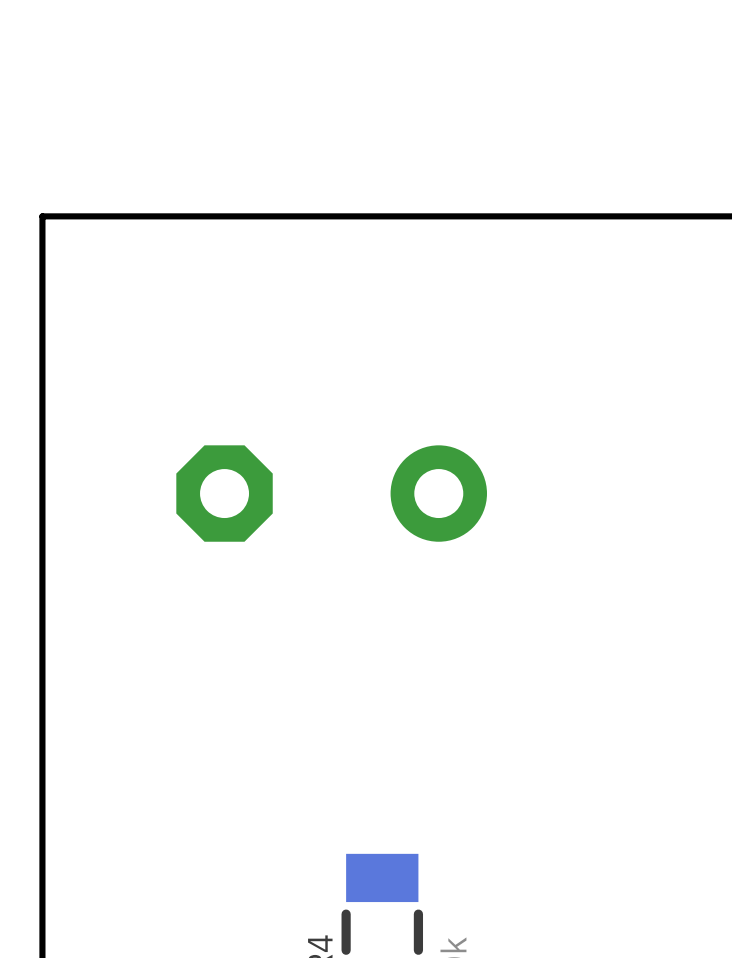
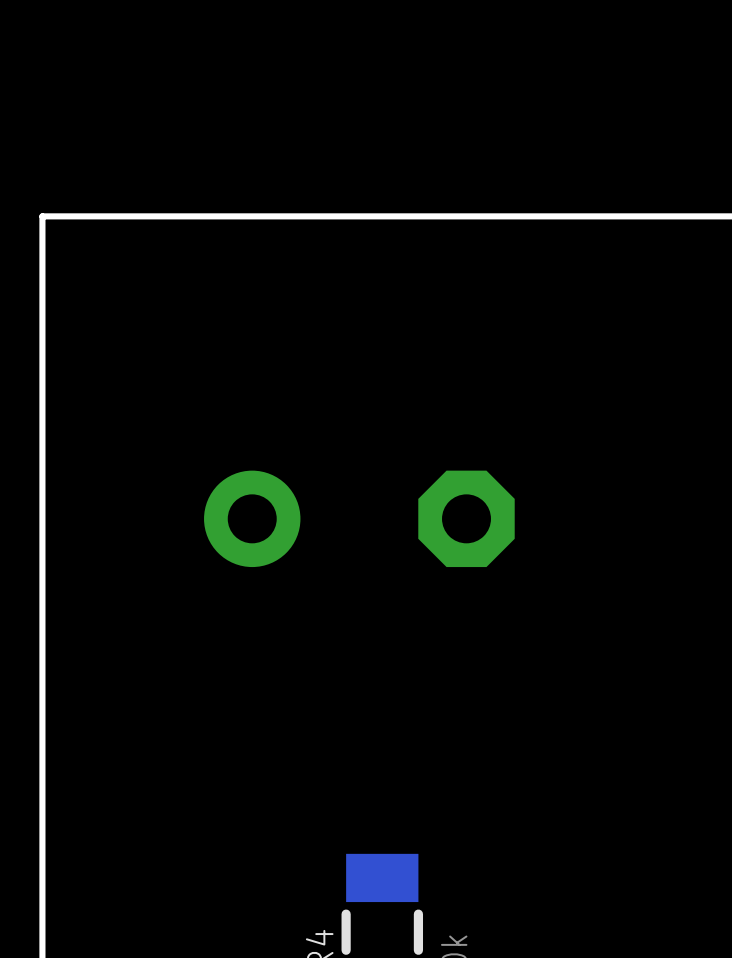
part rotation: 0° (331, 493) -> 180° (359, 518)

